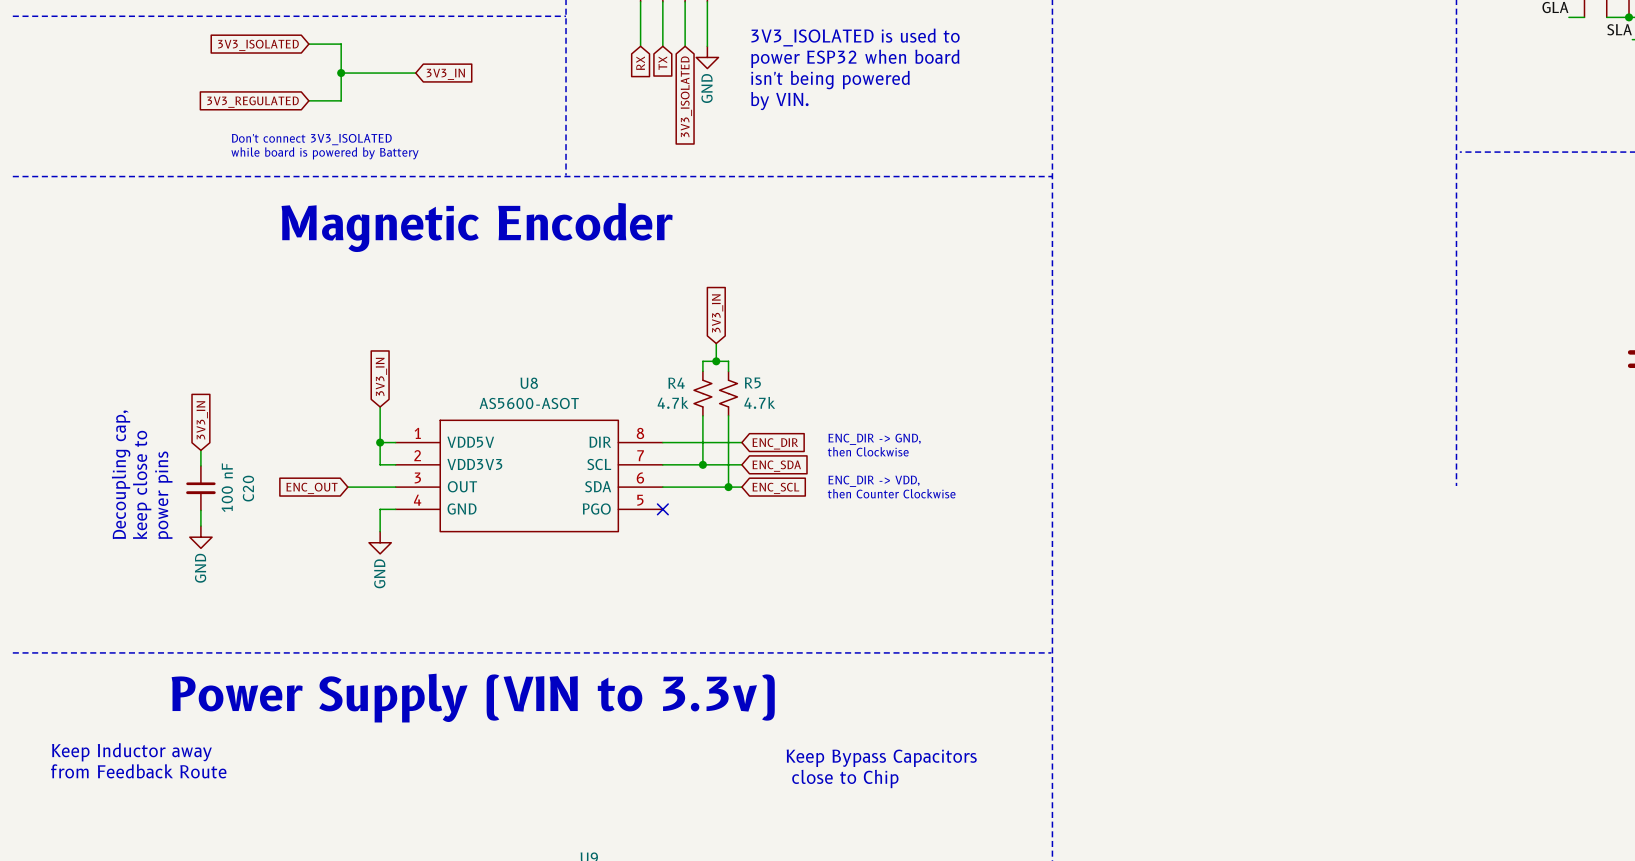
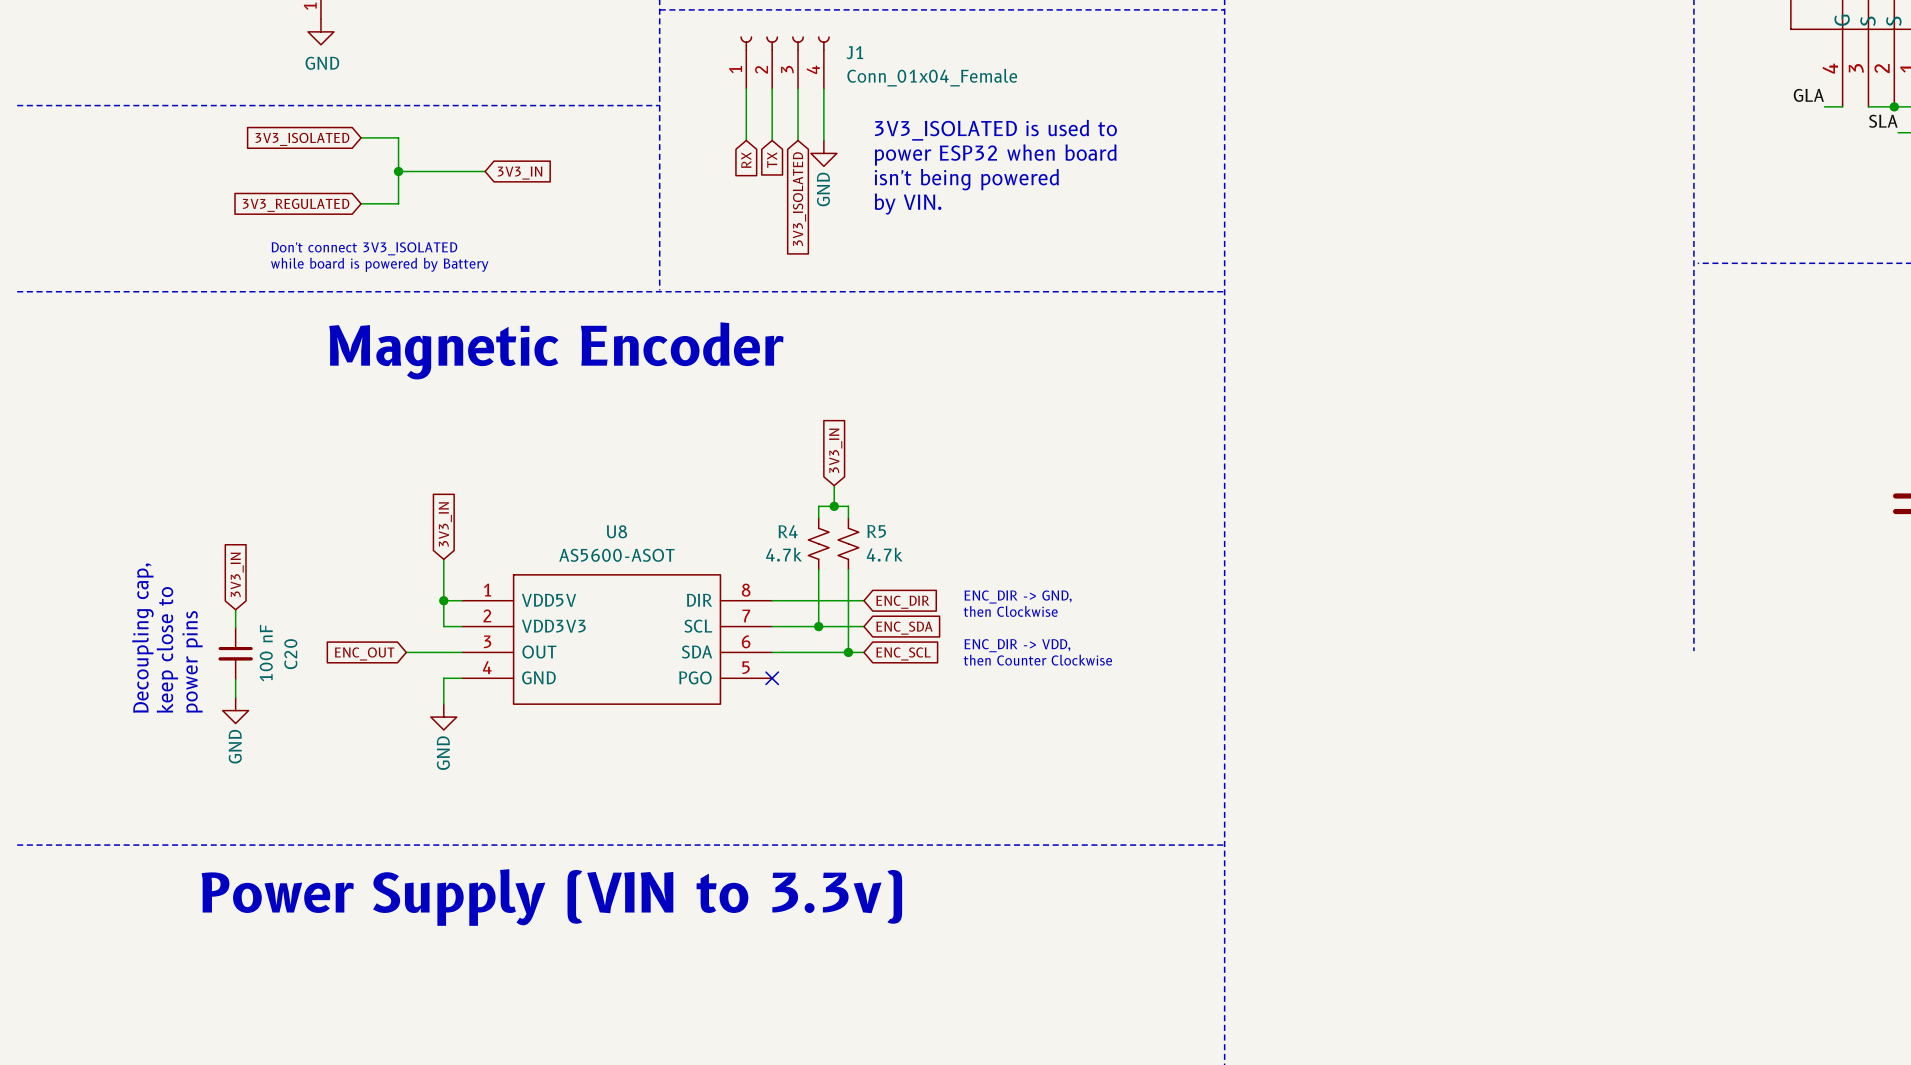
text: Keep Inductor away (131, 752) -> none
text: Keep Bypass Capacitors (881, 758) -> none
text: from Feedback Route (138, 771) -> none
text: close to Chip (845, 778) -> none

